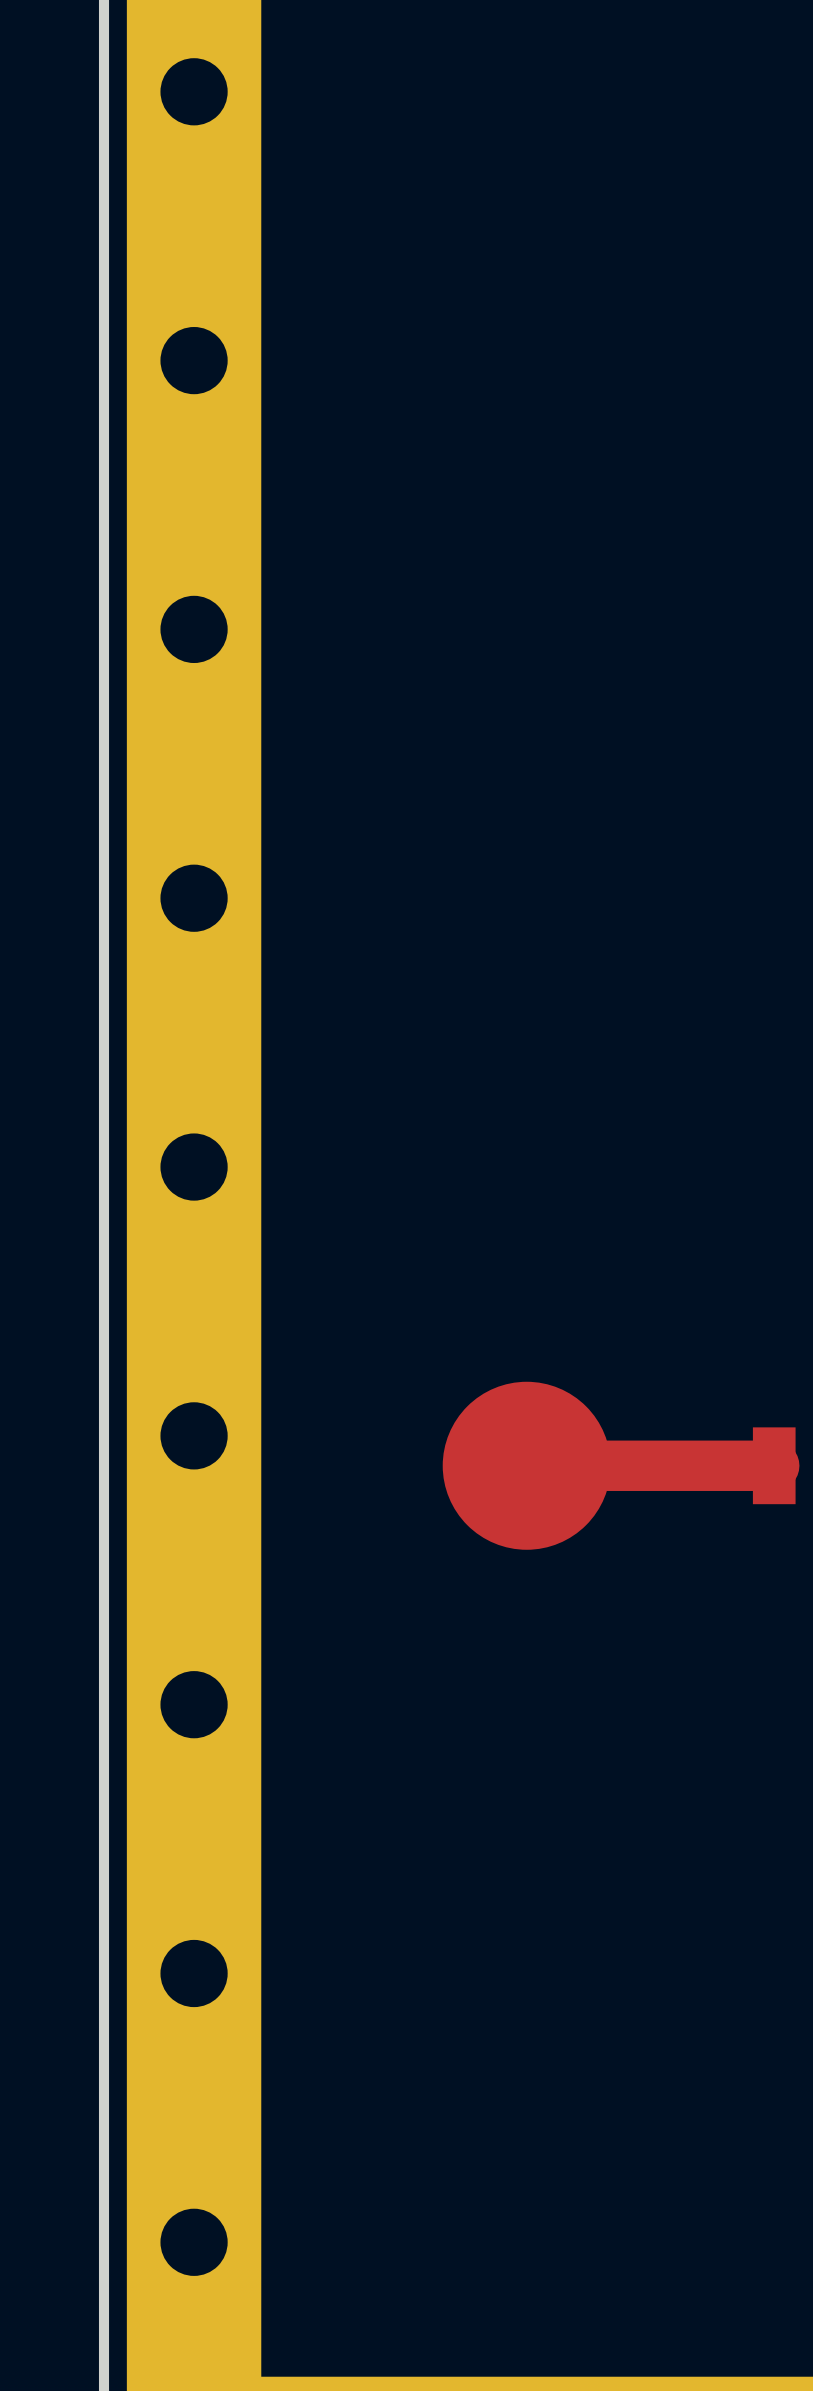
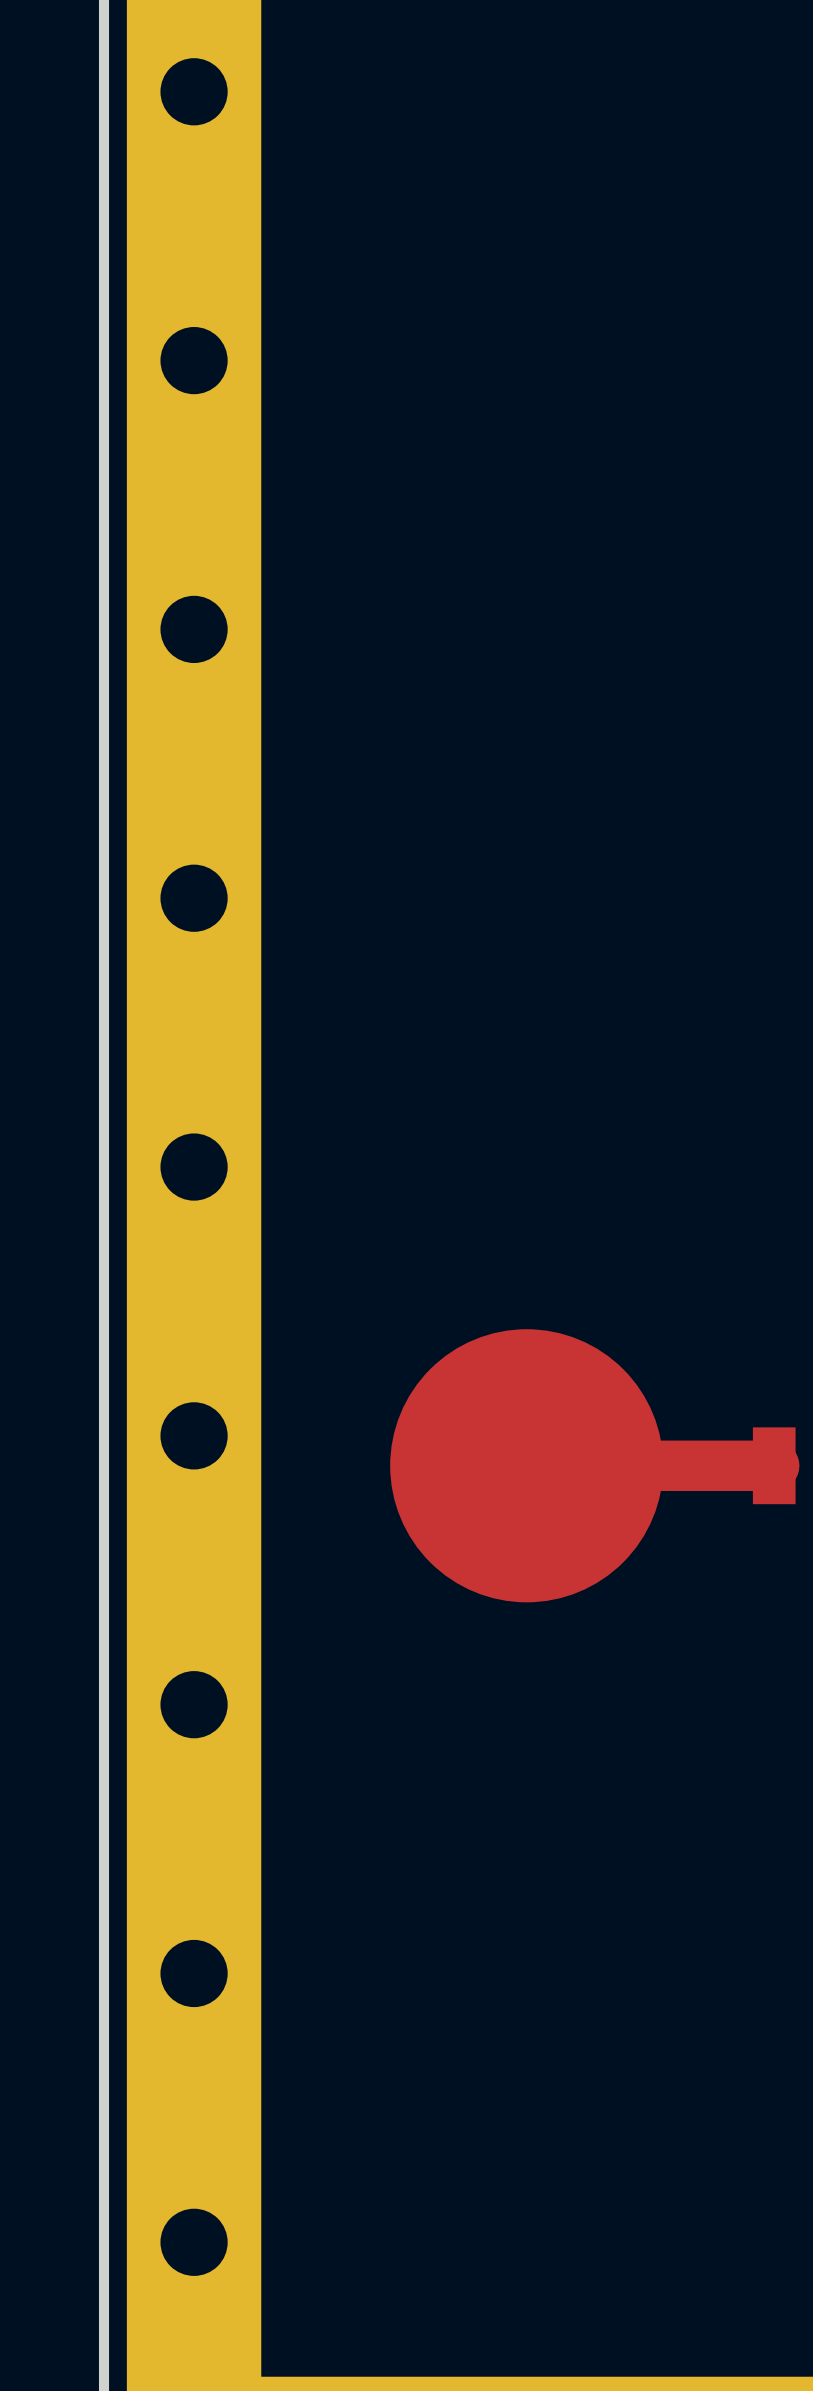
part footprint: [442, 1381, 611, 1550] -> [390, 1329, 664, 1603]

